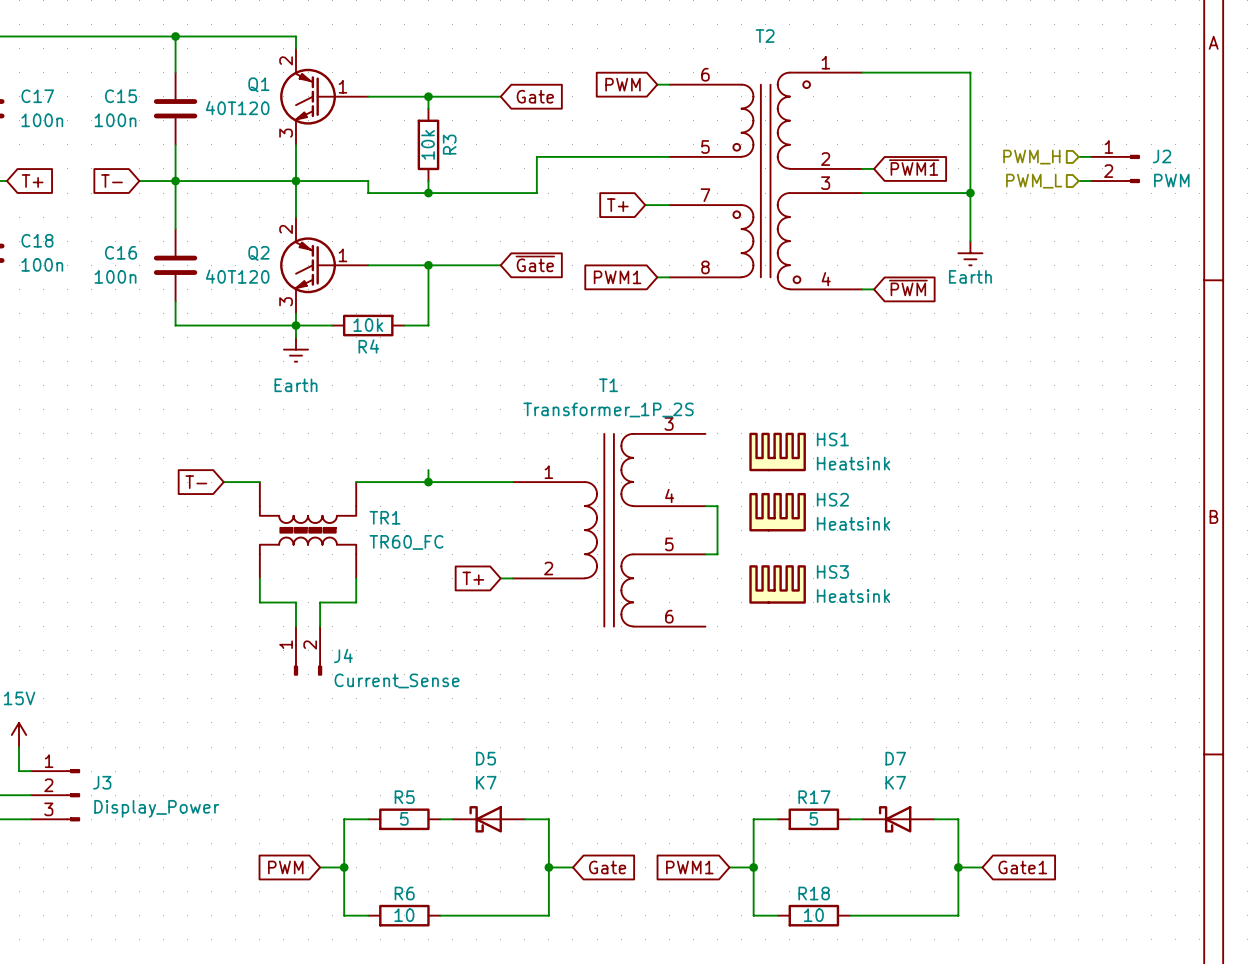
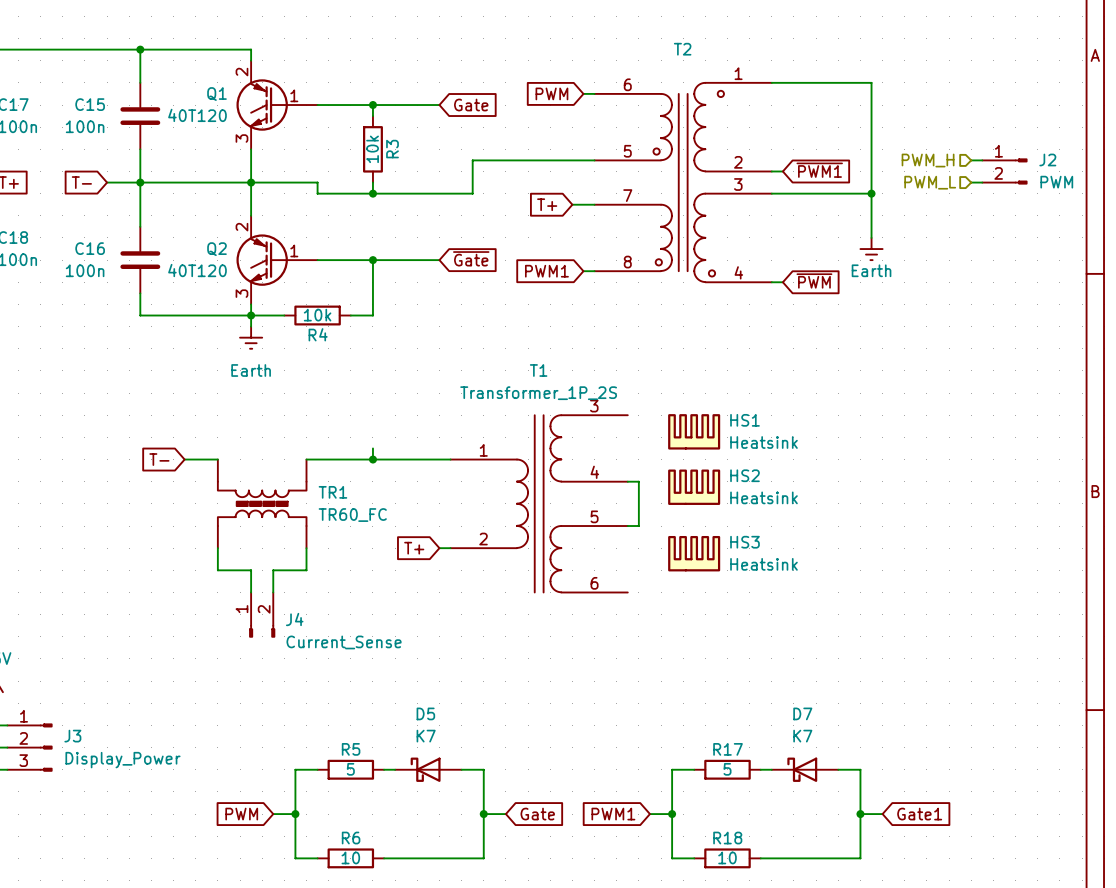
T2 symbol: [669, 72, 863, 290] -> [594, 82, 772, 283]

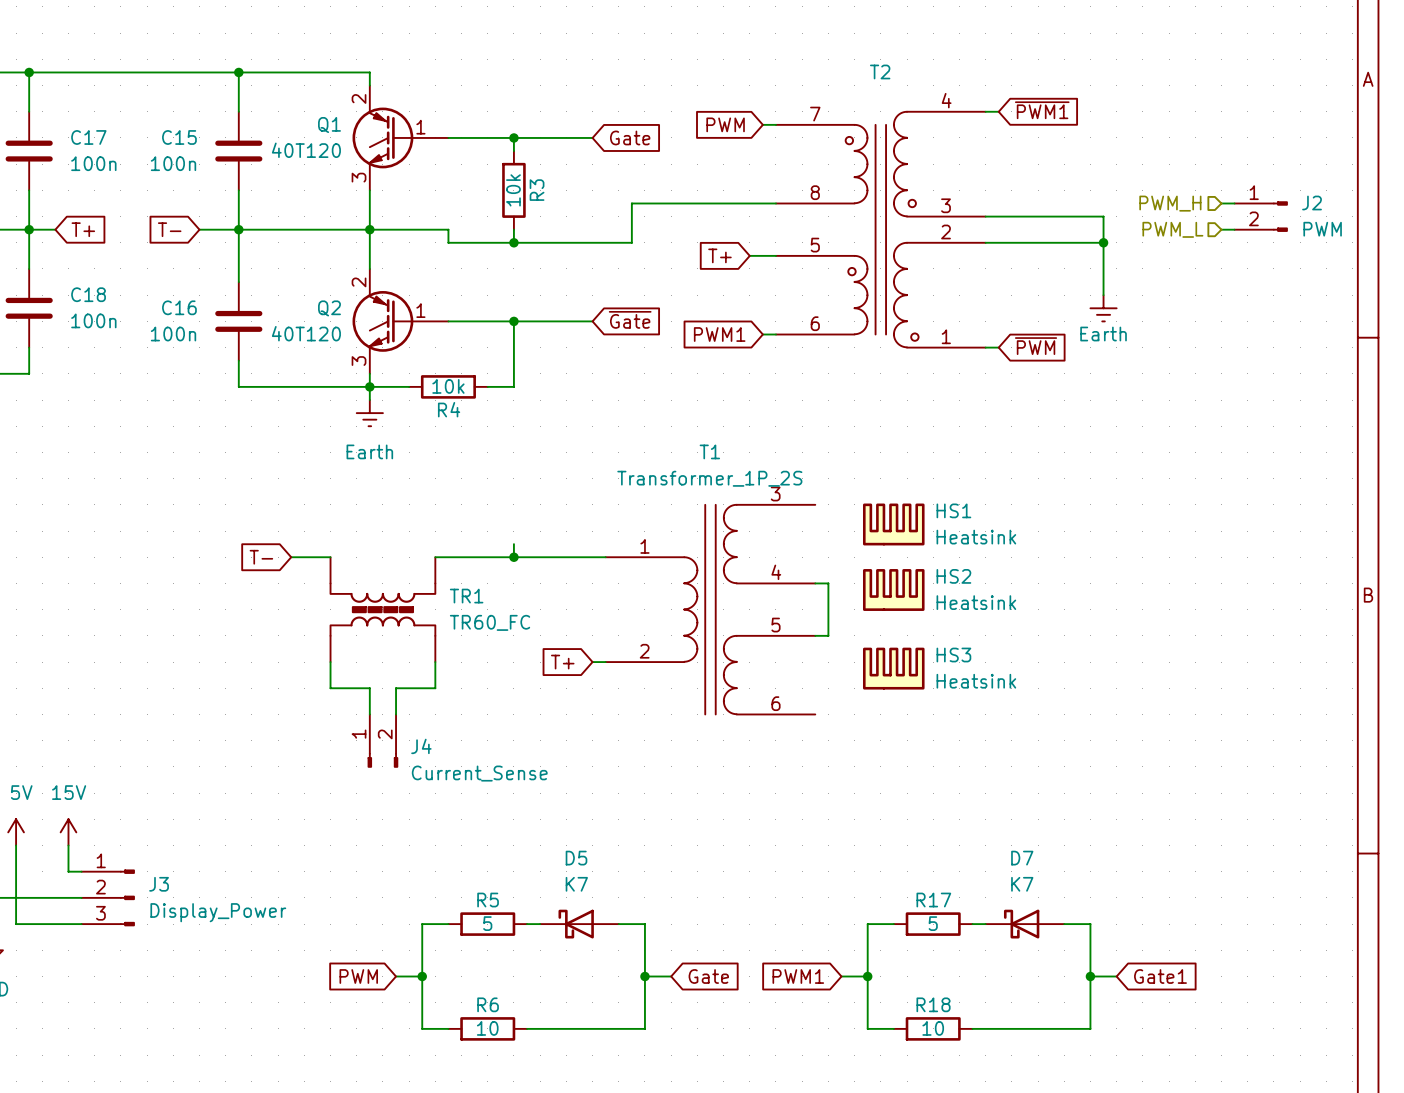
T2 symbol: [594, 82, 772, 283] -> [775, 111, 986, 348]
wire: (782, 82) (871, 82) (871, 171) -> (998, 216) (1103, 216)
global label position: ~{PWM1} (819, 170) -> ~{PWM1} (1042, 110)

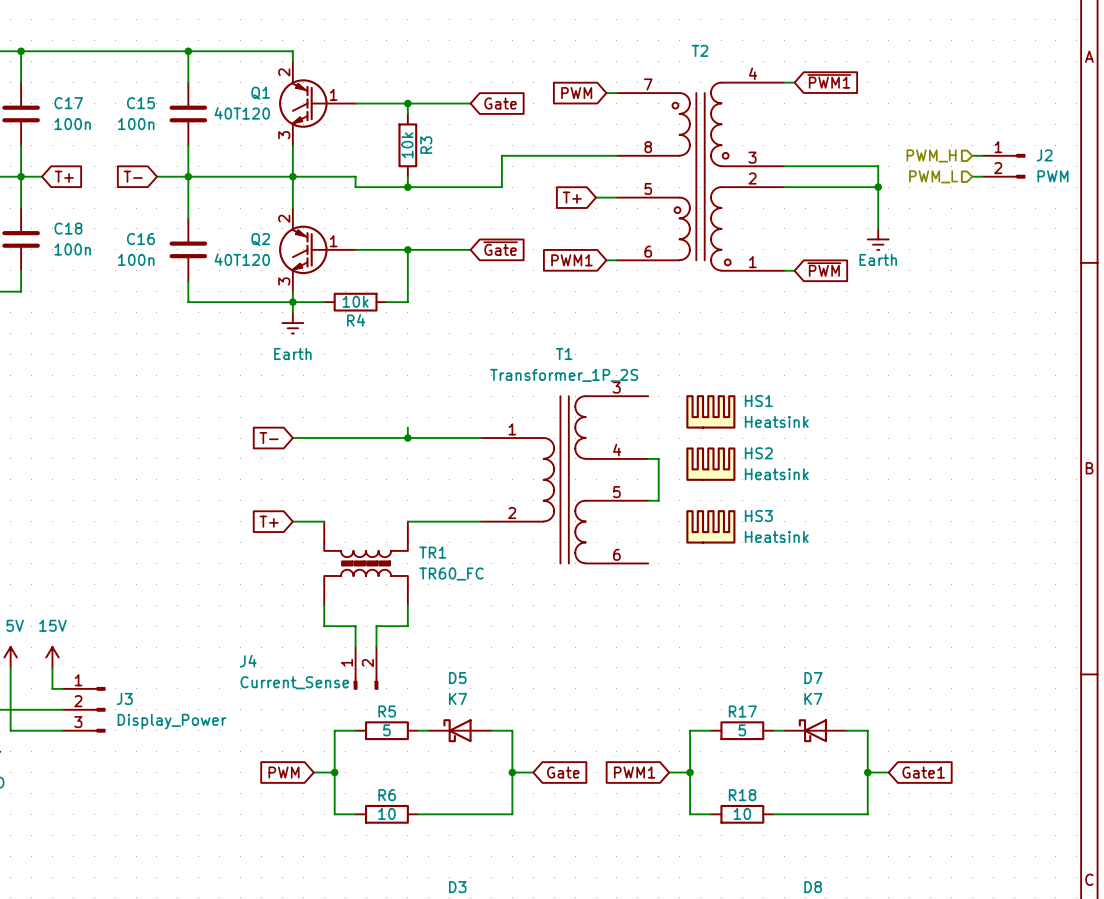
global label position: T- (261, 557) -> T- (269, 438)
wire: (291, 557) (330, 557) -> (292, 521) (324, 521)
wire: none -> (292, 438) (345, 438)
TR1 position: (382, 609) -> (366, 563)
wire: (330, 662) (330, 688) (369, 688) (369, 714) -> (324, 605) (324, 626) (355, 626) (355, 647)
wire: (435, 662) (435, 688) (396, 688) (396, 714) -> (407, 605) (407, 626) (376, 626) (376, 647)
wire: none -> (407, 521) (470, 521)
global label position: T+ (562, 662) -> T+ (269, 521)
J4 position: (382, 741) -> (366, 668)
J4 name position: J4 (421, 746) -> J4 (248, 661)
J4 value position: Current_Sense (479, 773) -> Current_Sense (294, 682)

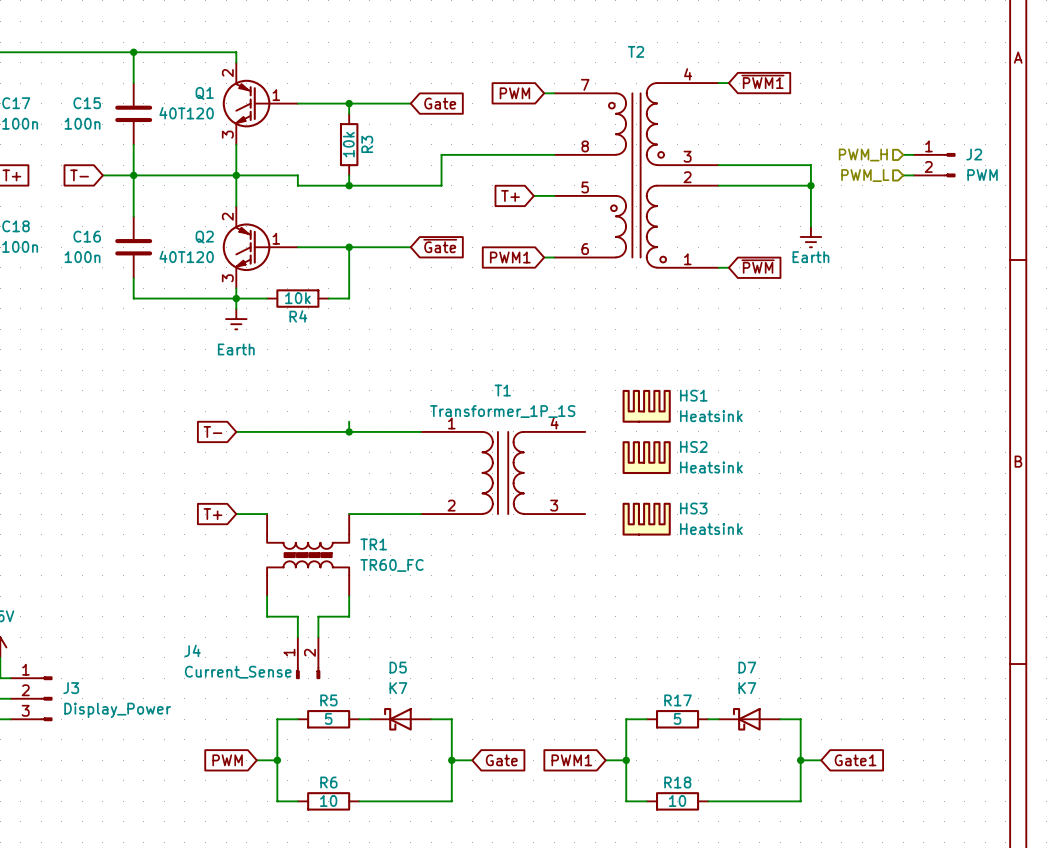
T1 name position: T1 (564, 354) -> T1 (502, 390)
T1 value: Transformer_1P_2S (564, 375) -> Transformer_1P_1S (502, 411)
T1 symbol: [481, 396, 649, 564] -> [421, 431, 586, 515]
wire: (648, 458) (658, 458) (658, 500) (648, 500) -> none

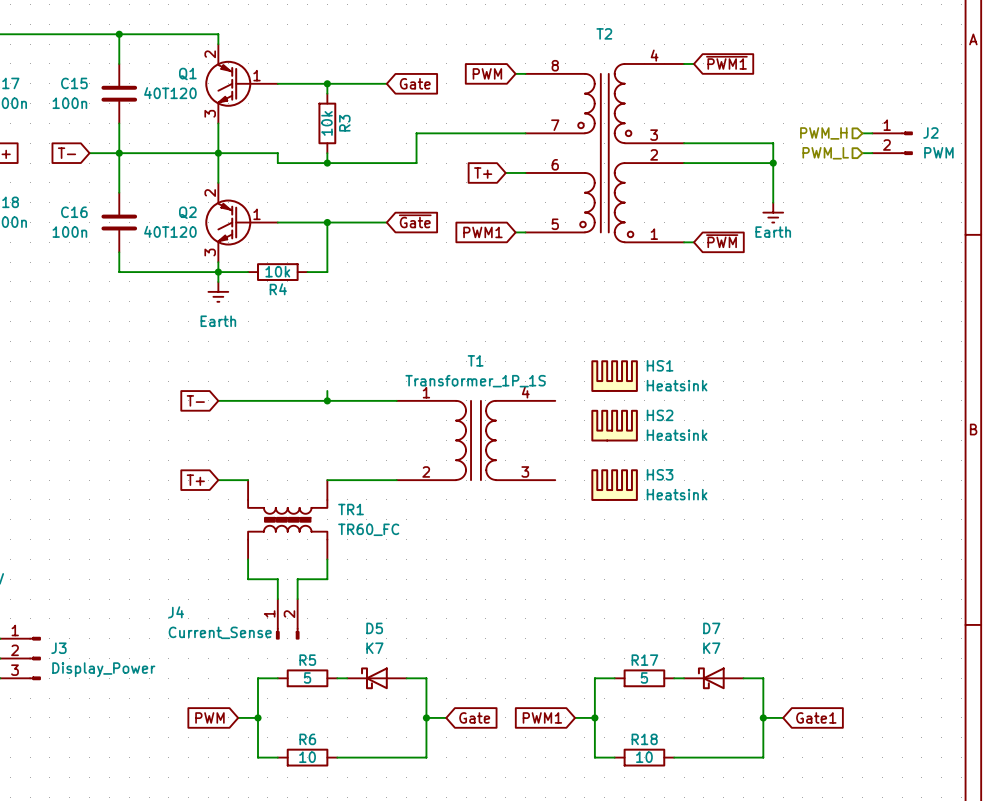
T2 symbol: [554, 83, 719, 268] -> [525, 63, 685, 243]

